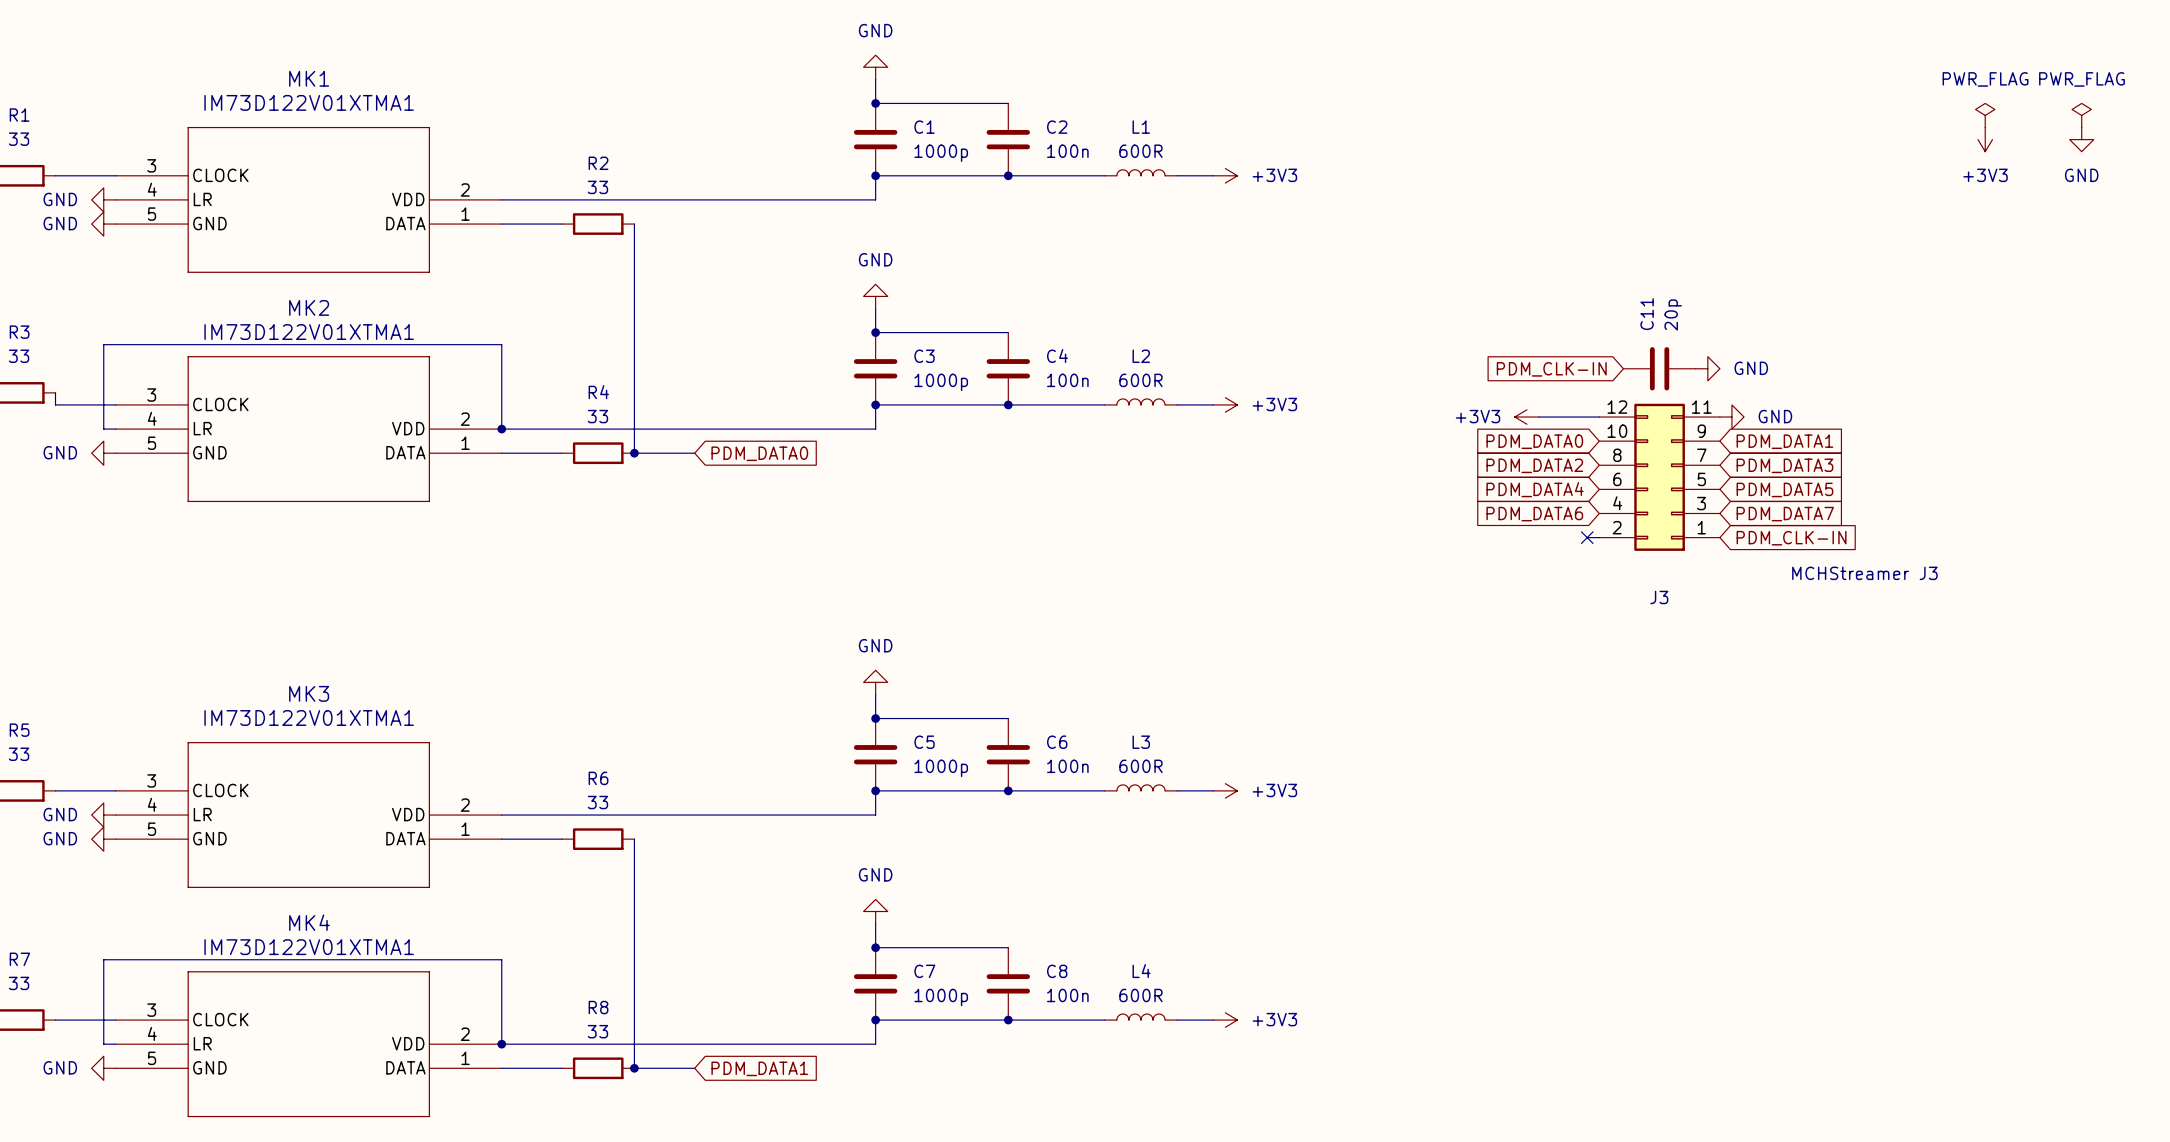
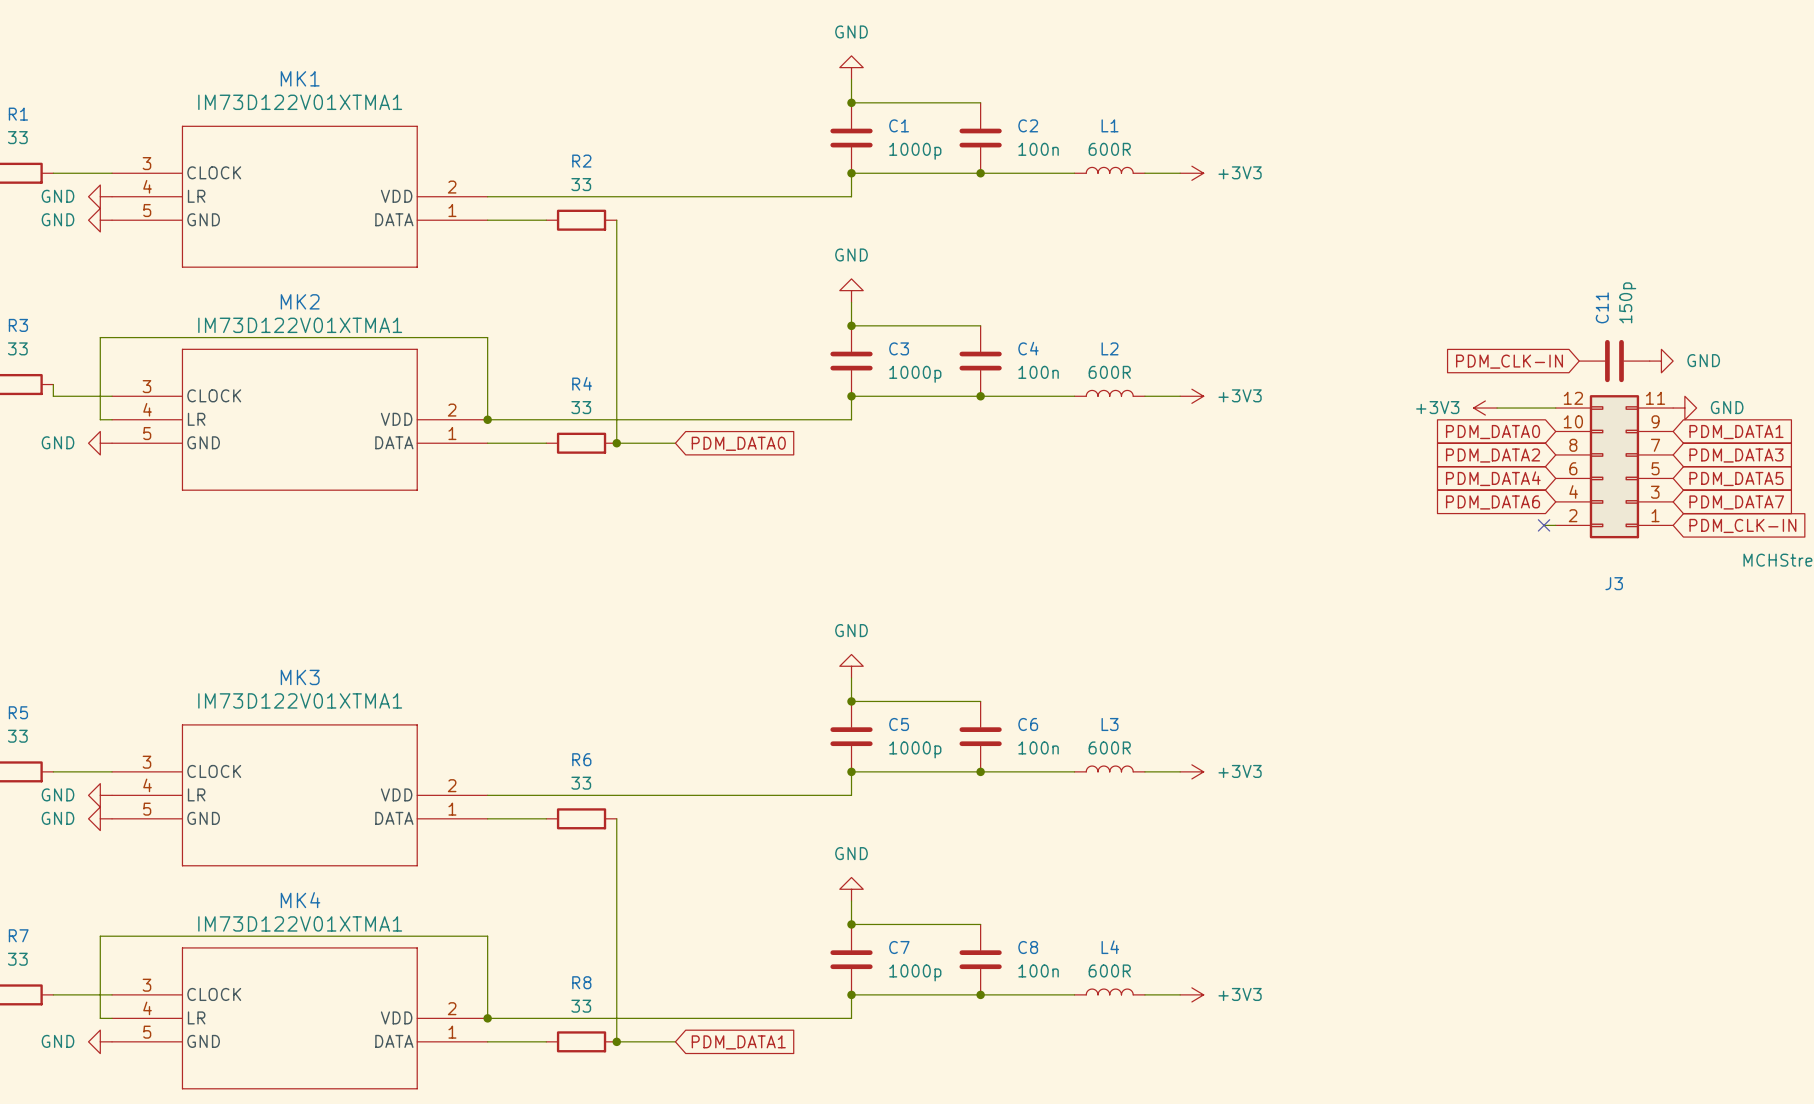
C11 value: 20p (1673, 314) -> 150p (1627, 302)

